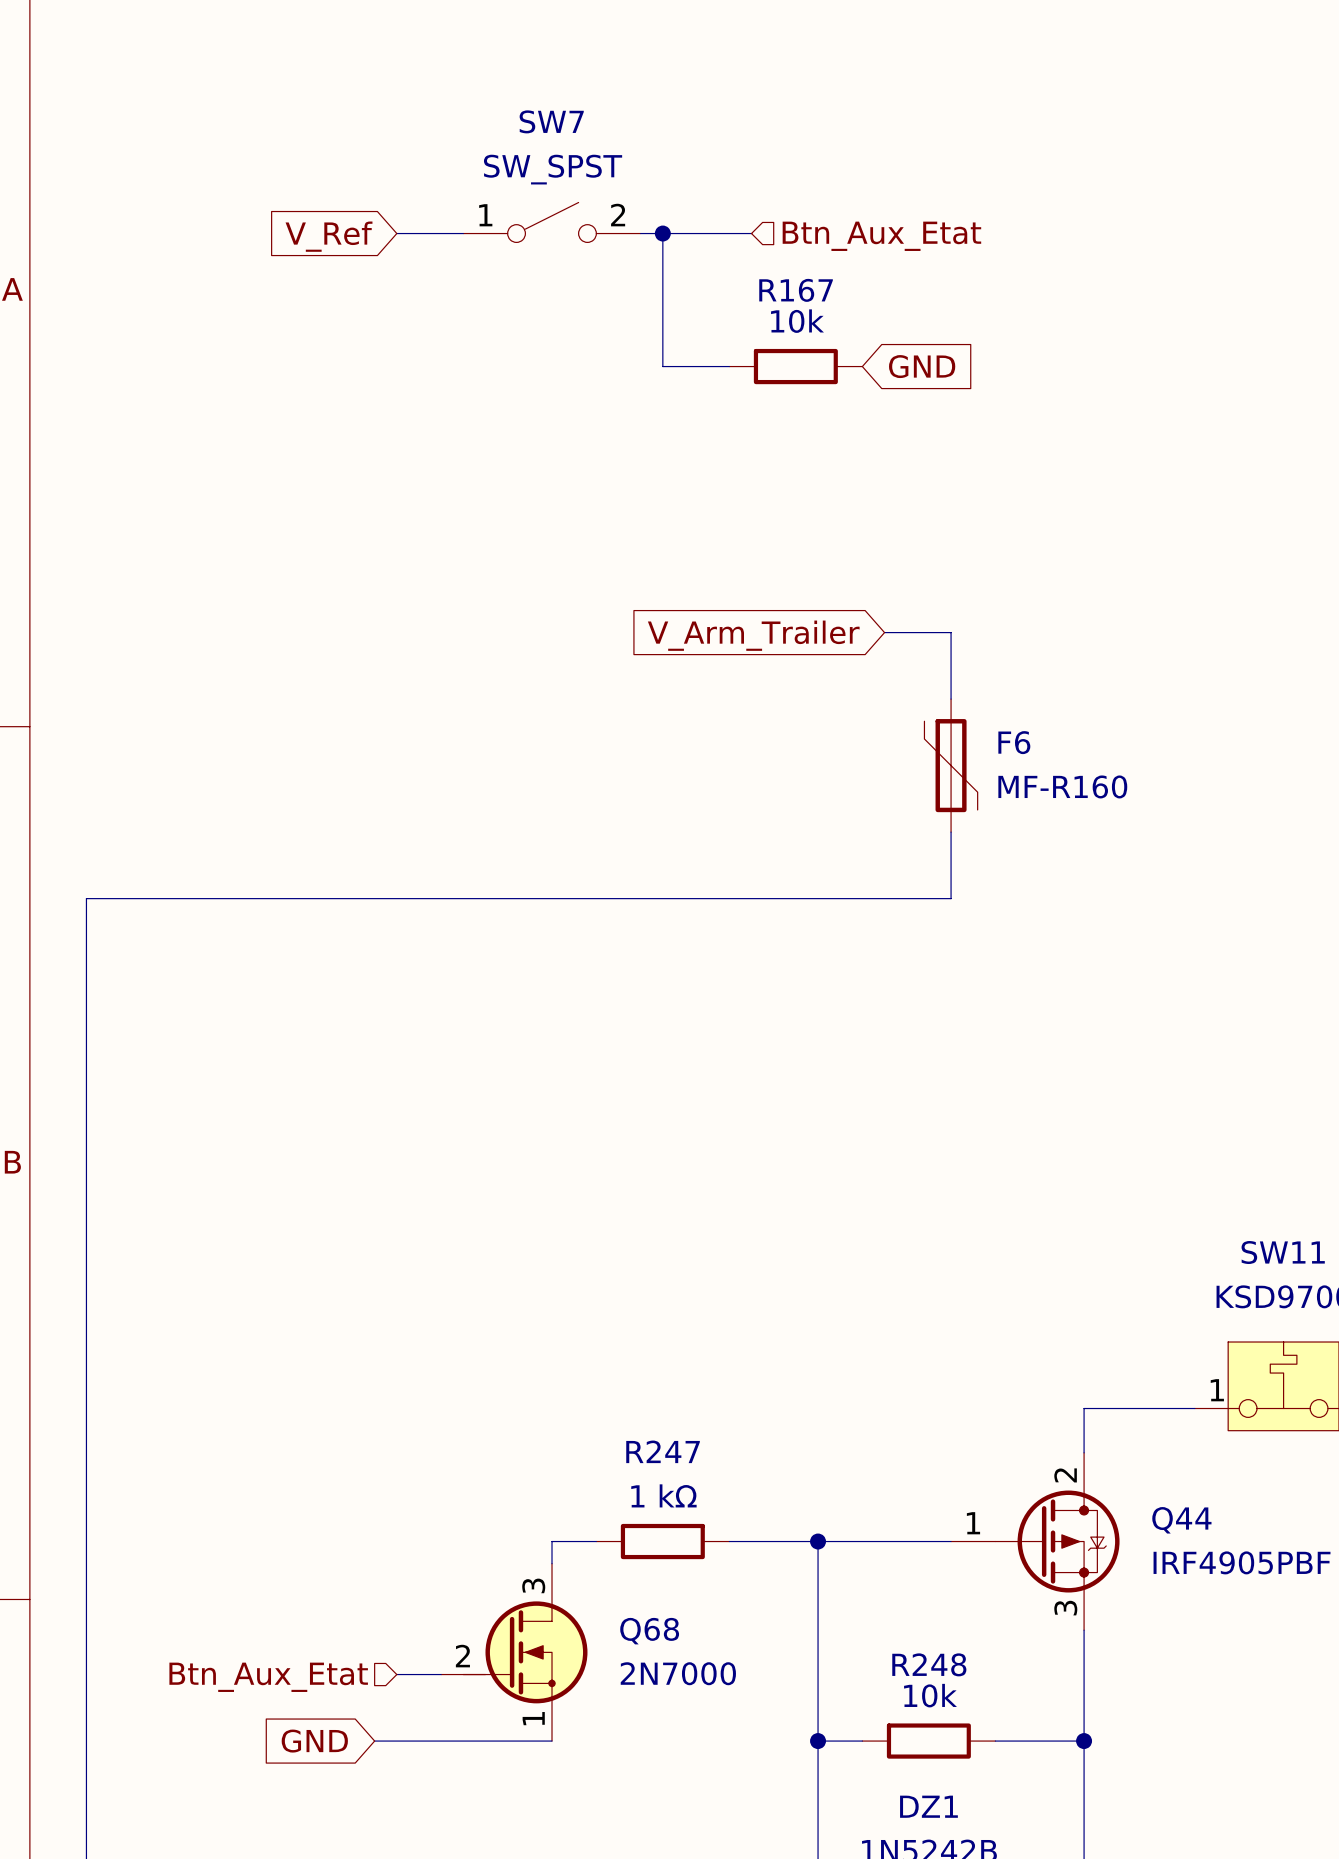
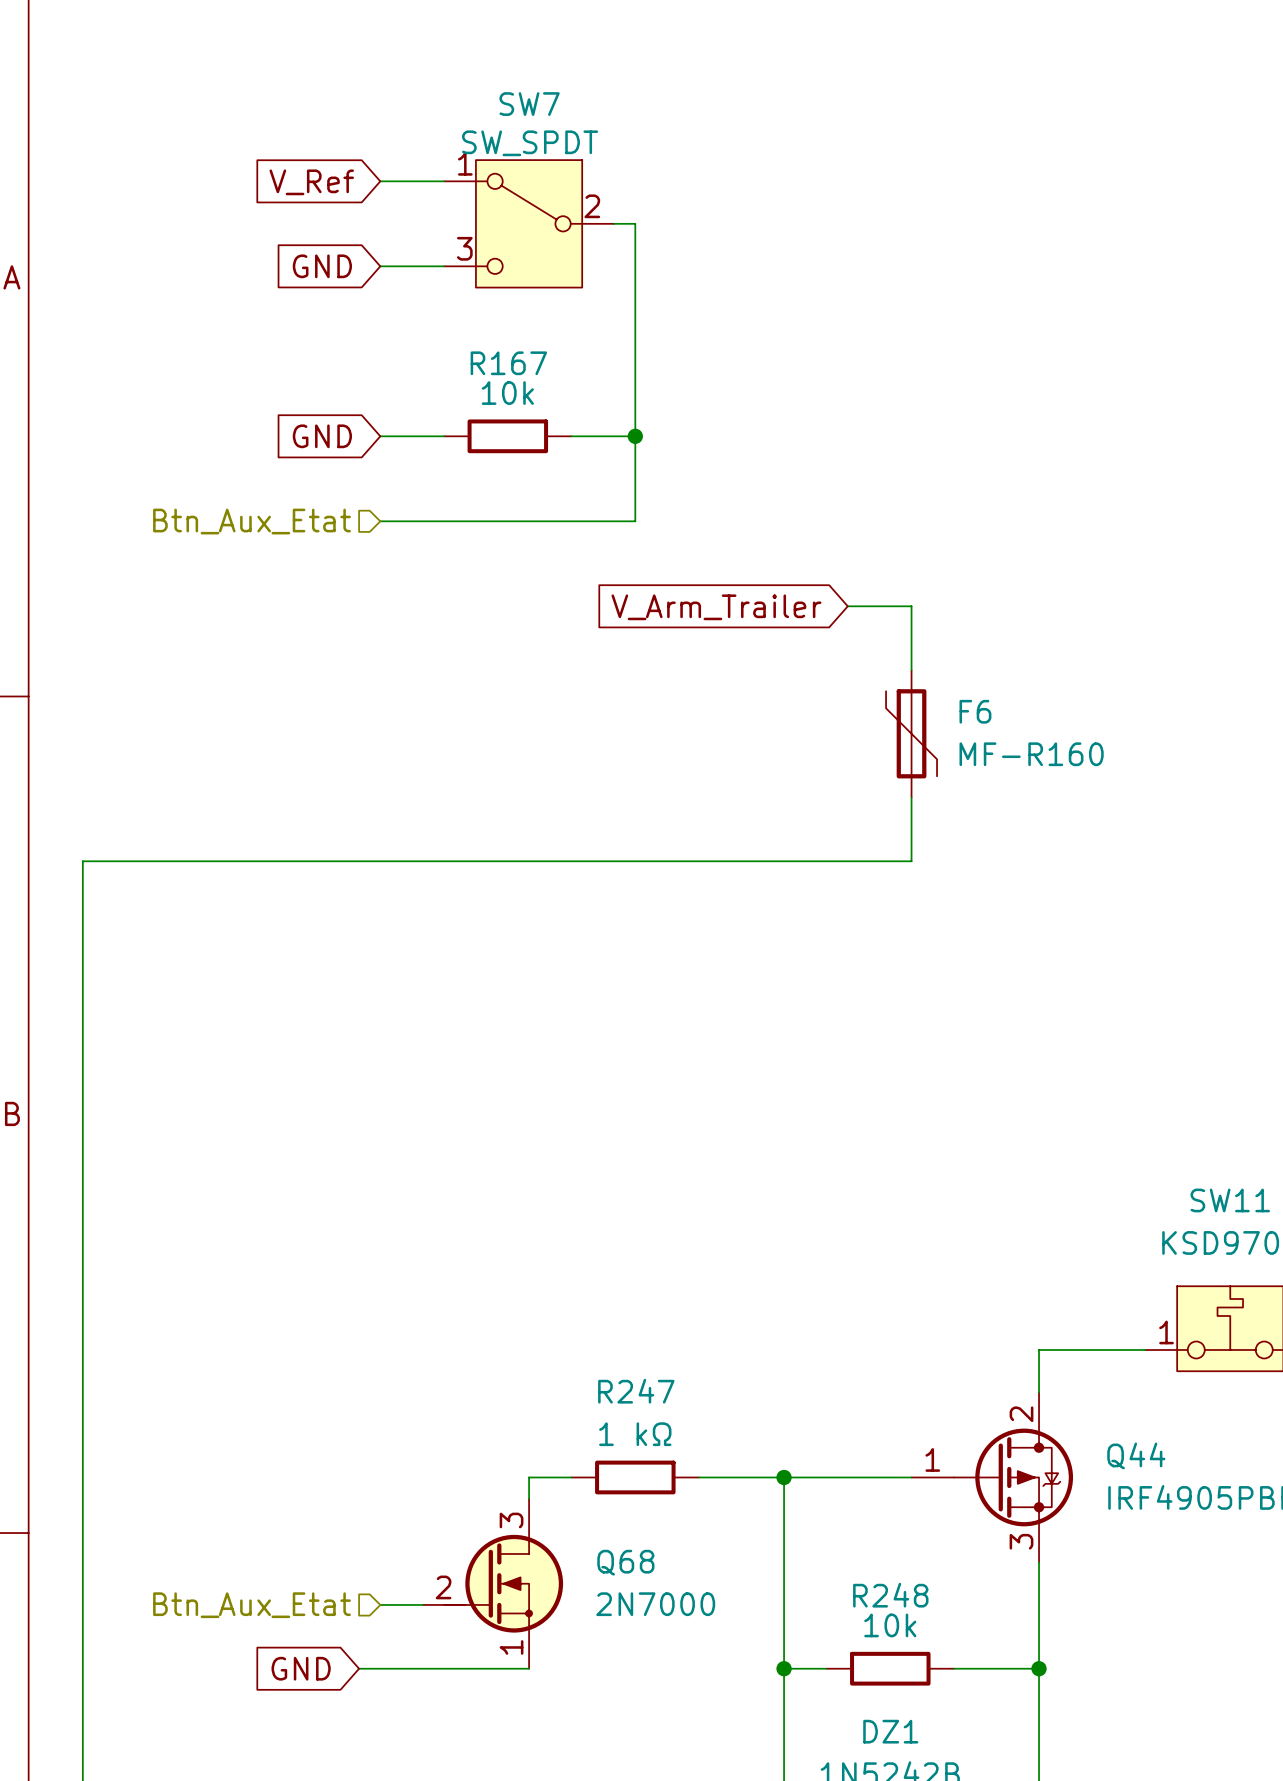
SW7 value: SW_SPST (553, 169) -> SW_SPDT (530, 143)
SW7 symbol: [463, 202, 641, 243] -> [444, 160, 615, 288]
wire: (396, 233) (463, 233) -> (380, 181) (444, 181)
wire: (662, 233) (751, 233) -> none
junction: (662, 233) -> none
global label position: V_Ref (329, 236) -> V_Ref (311, 182)
hierarchical label: Btn_Aux_Etat (881, 236) -> none
global label: none -> GND (322, 266)
wire: none -> (380, 266) (444, 266)
wire: (662, 366) (729, 366) -> (635, 351) (635, 521) (380, 521)
R167 position: (795, 366) -> (507, 436)
global label: GND (922, 366) -> none
global label: none -> GND (322, 436)
wire: none -> (380, 436) (444, 436)
wire: none -> (571, 436) (635, 436)
junction: none -> (635, 436)
hierarchical label: none -> Btn_Aux_Etat (252, 521)

